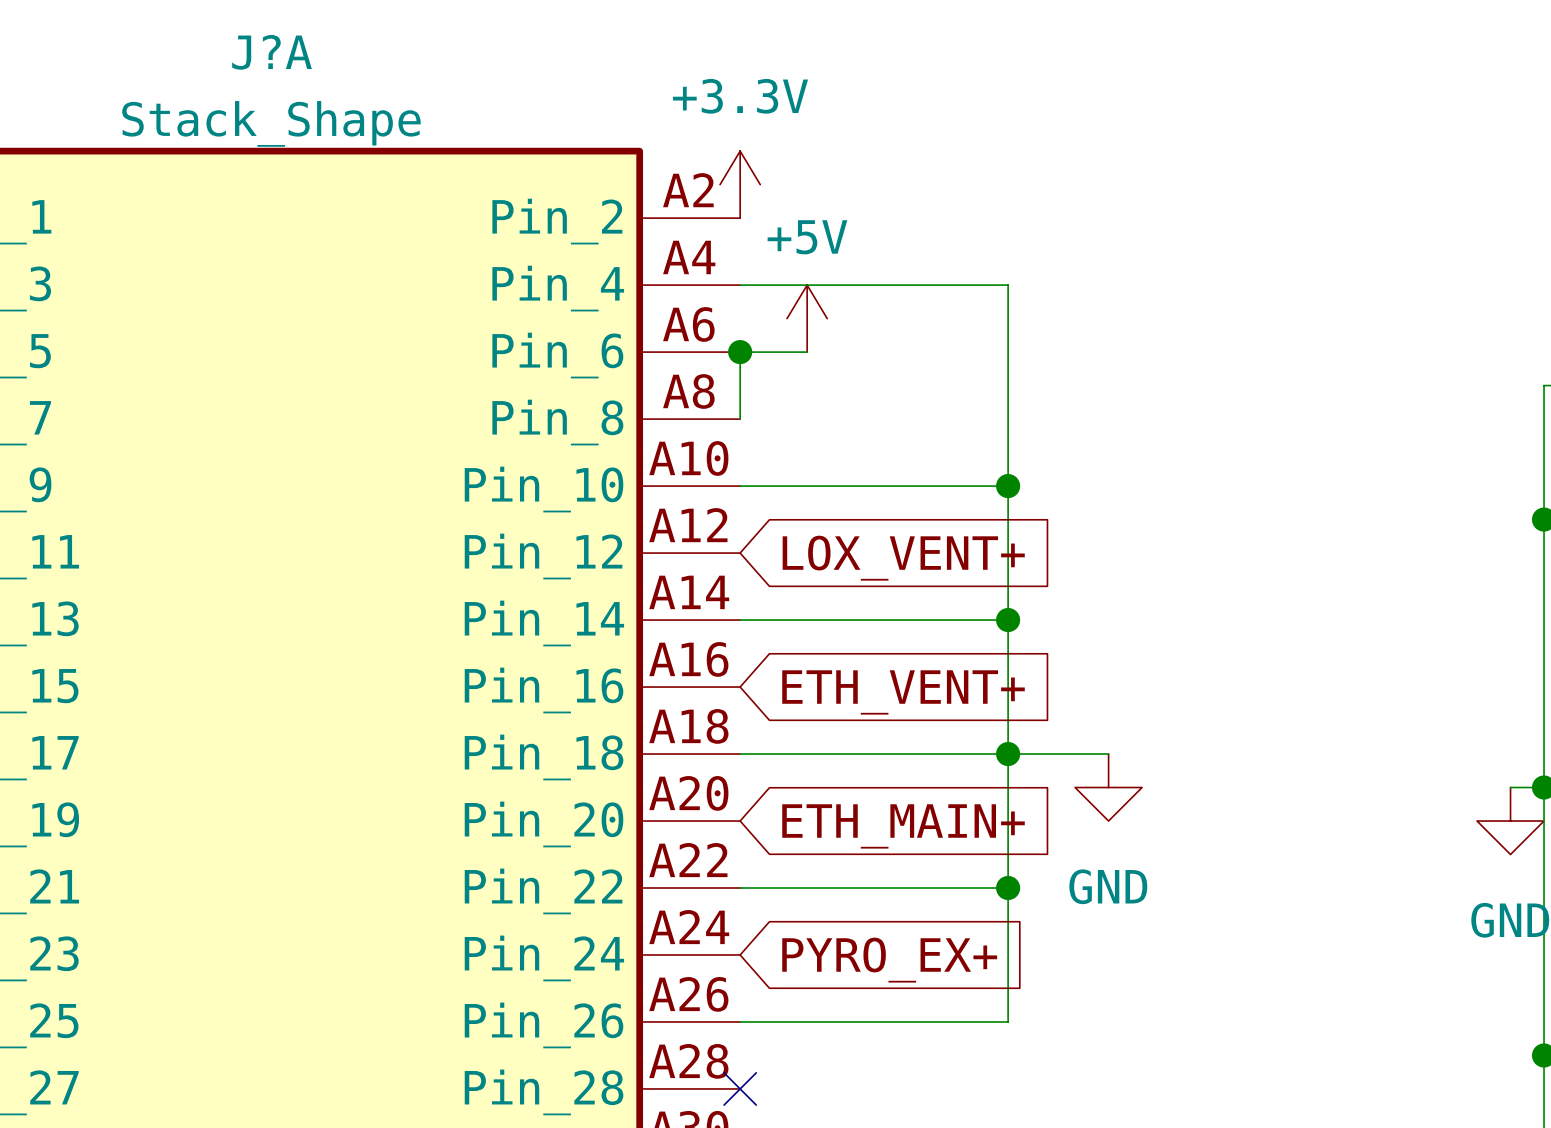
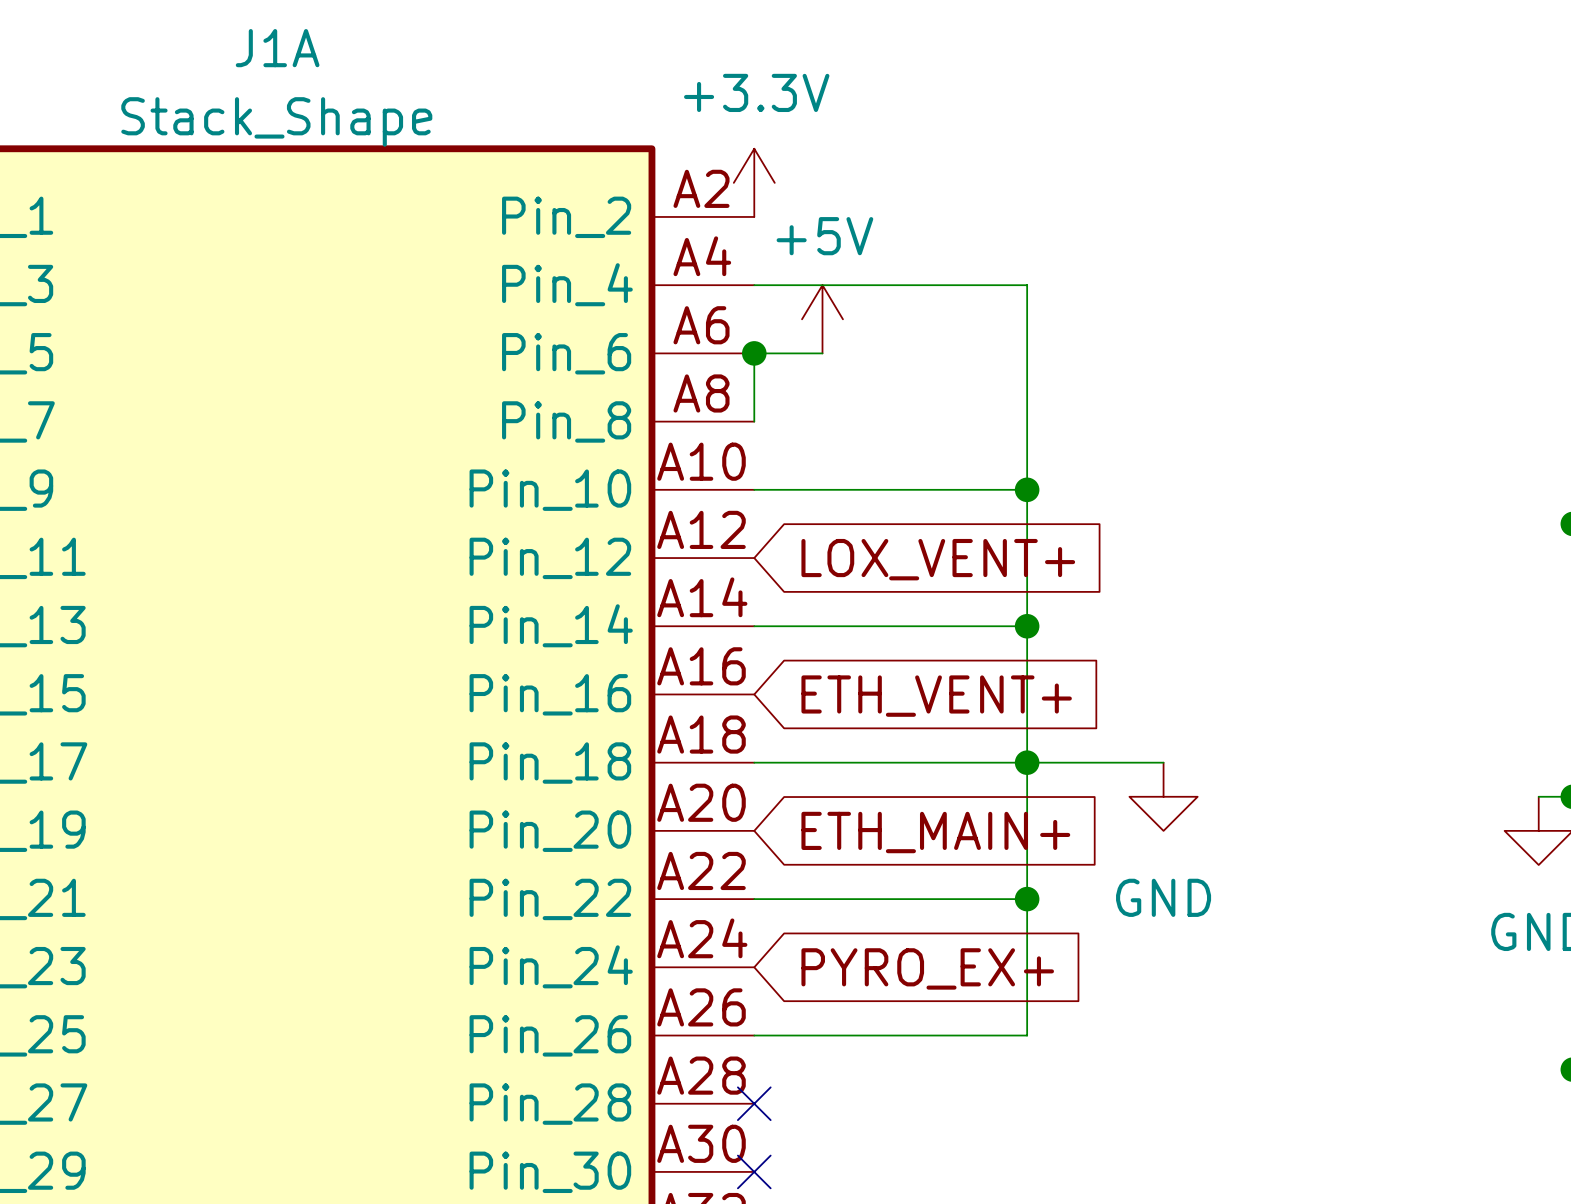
J?A name: J?A (272, 52) -> J1A (277, 48)
wire: none -> (1129, 762) (1163, 762)
power symbol position: GND (1108, 787) -> GND (1163, 796)

